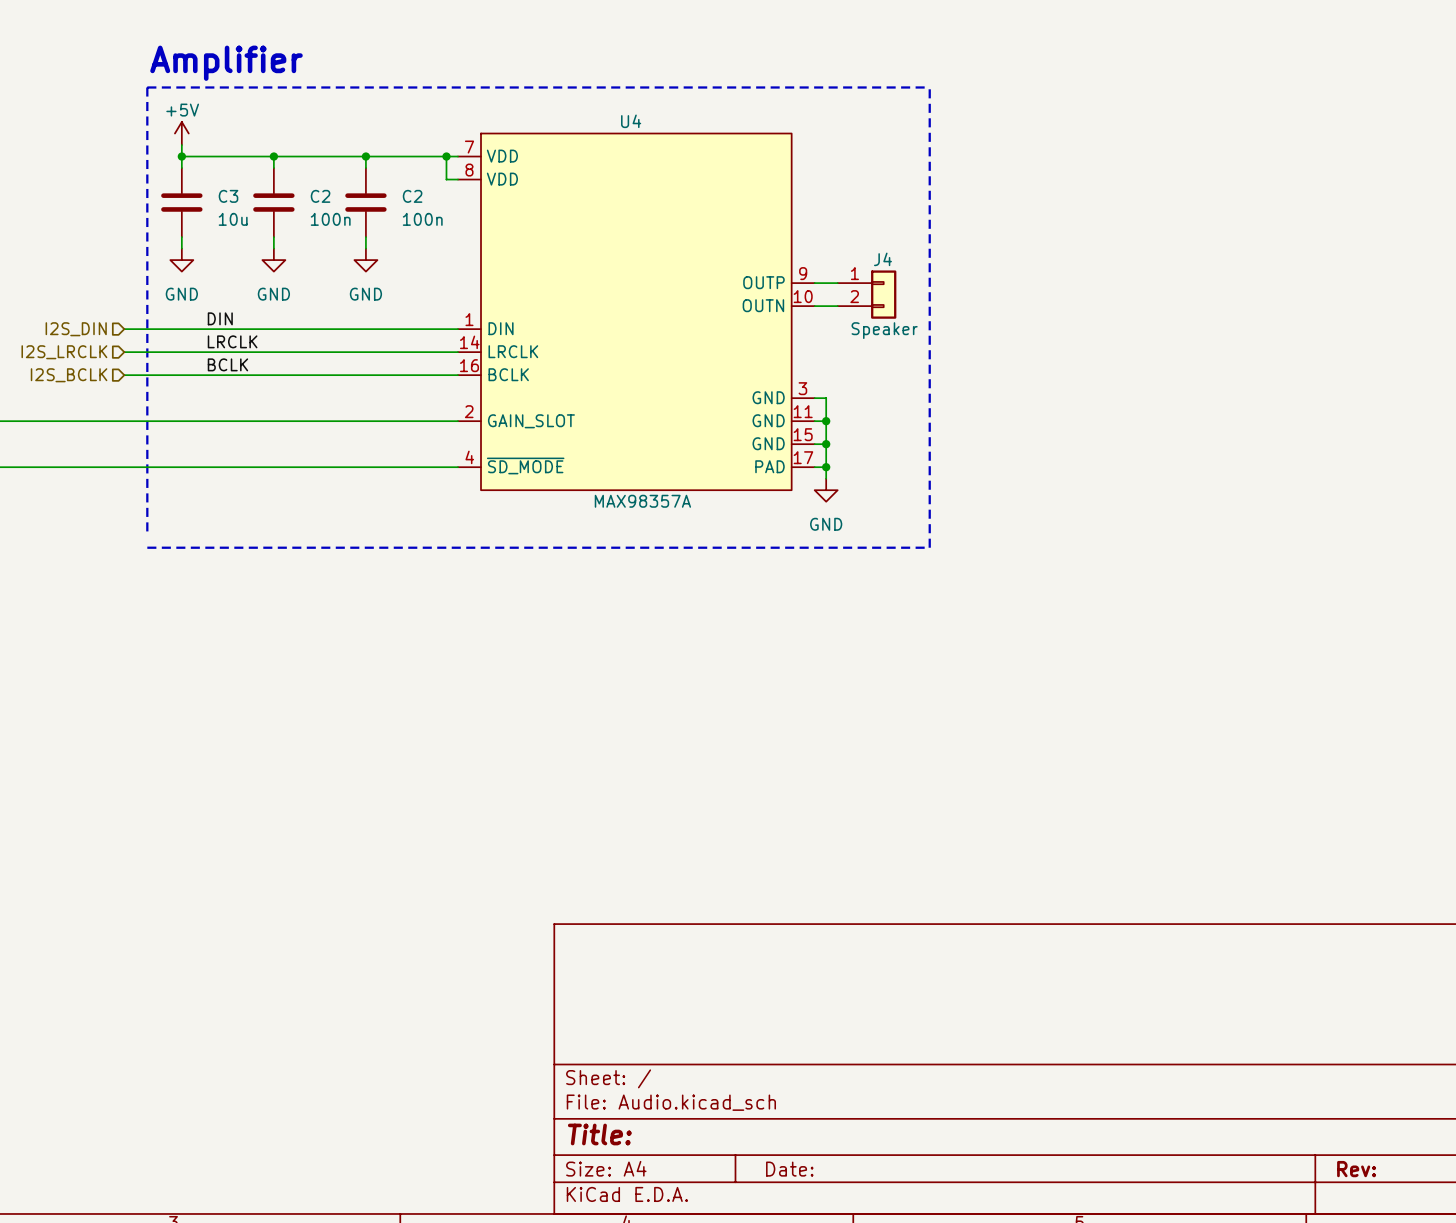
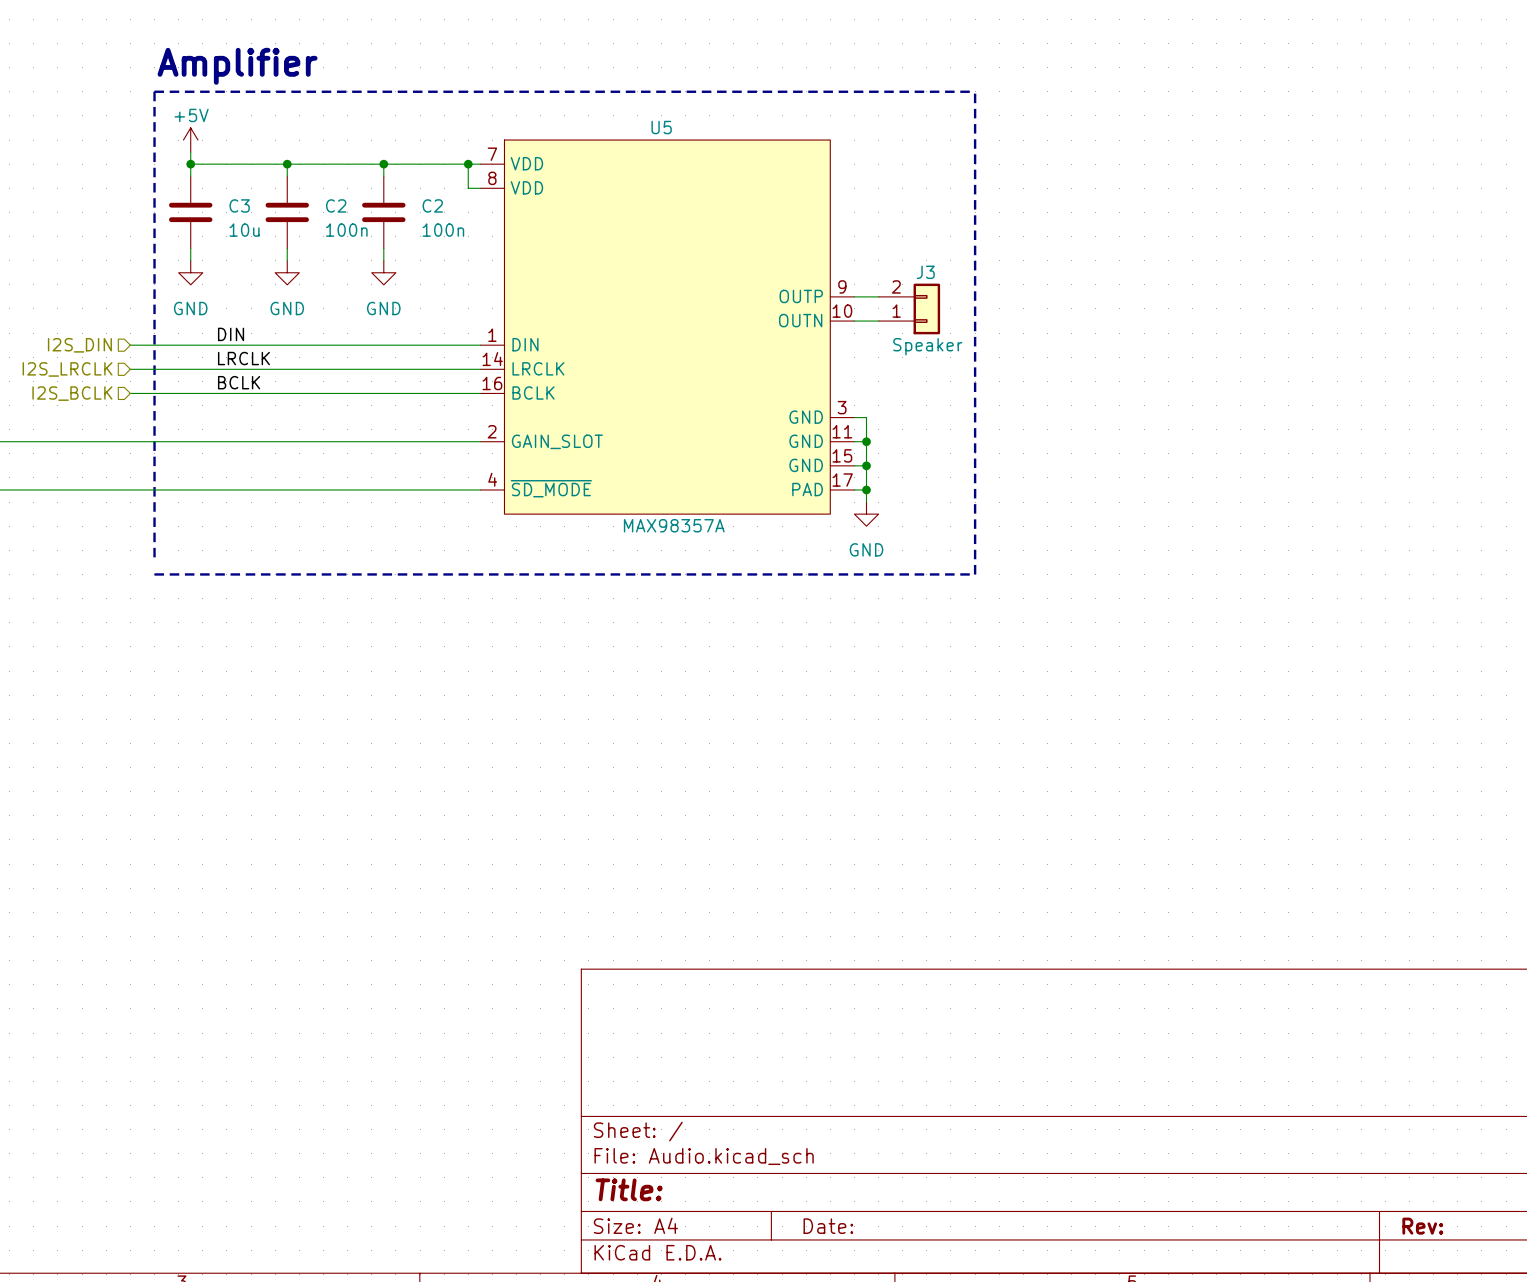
U4 name: U4 (631, 121) -> U5 (661, 127)
J4 name: J4 (882, 259) -> J3 (925, 272)
J4 flip: as is (883, 294) -> up-down (926, 308)

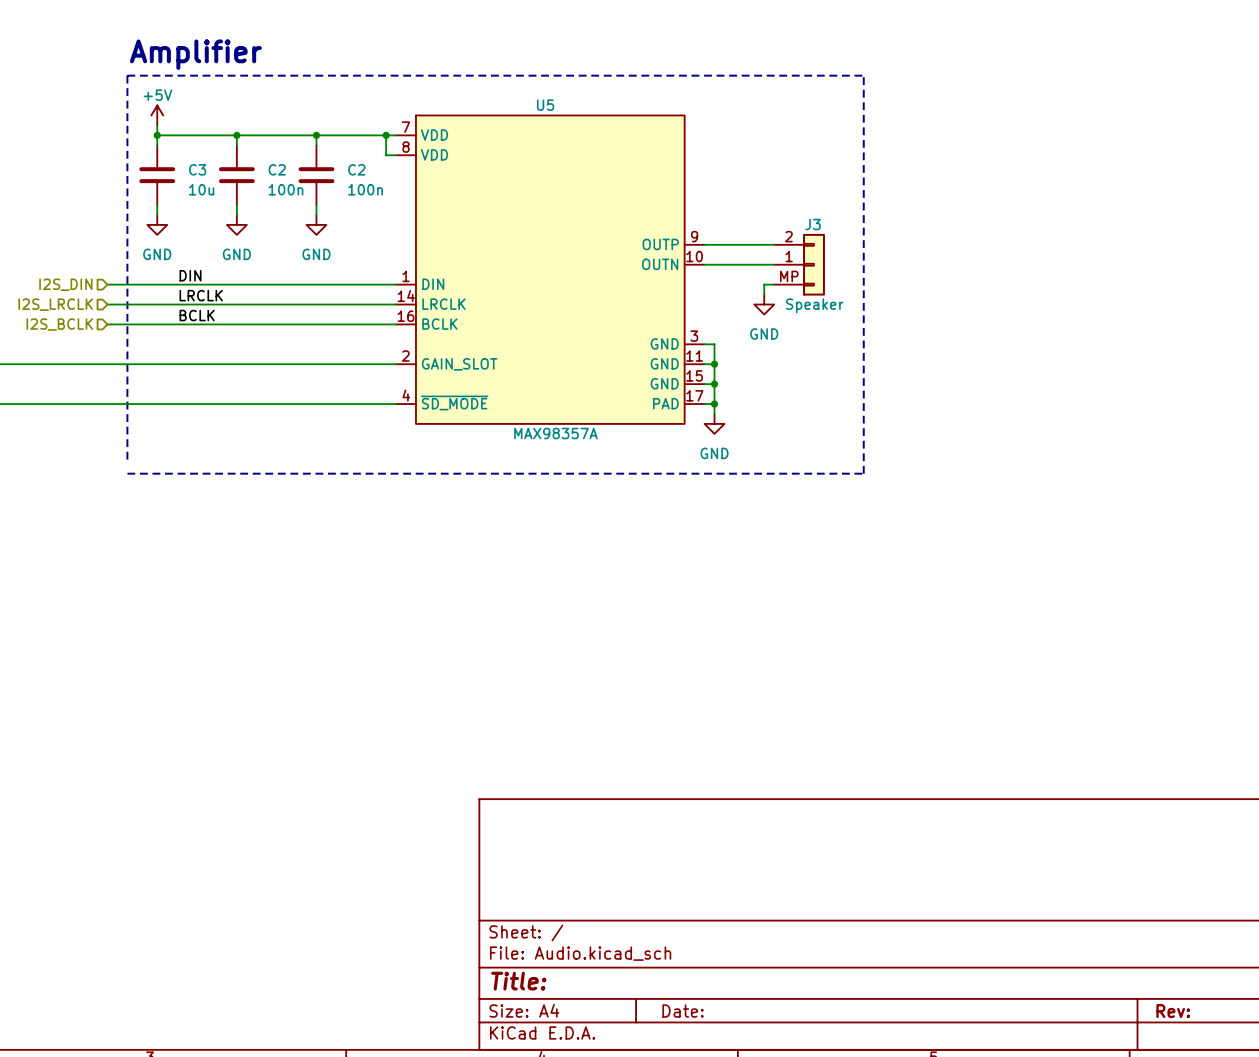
line: (975, 91) (975, 574) -> (804, 75) (863, 75) (863, 473) (804, 473)
J3 symbol: [878, 283, 941, 335] -> [774, 233, 825, 296]
wire: none -> (774, 284) (764, 284) (764, 294)
power symbol: none -> GND (764, 304)

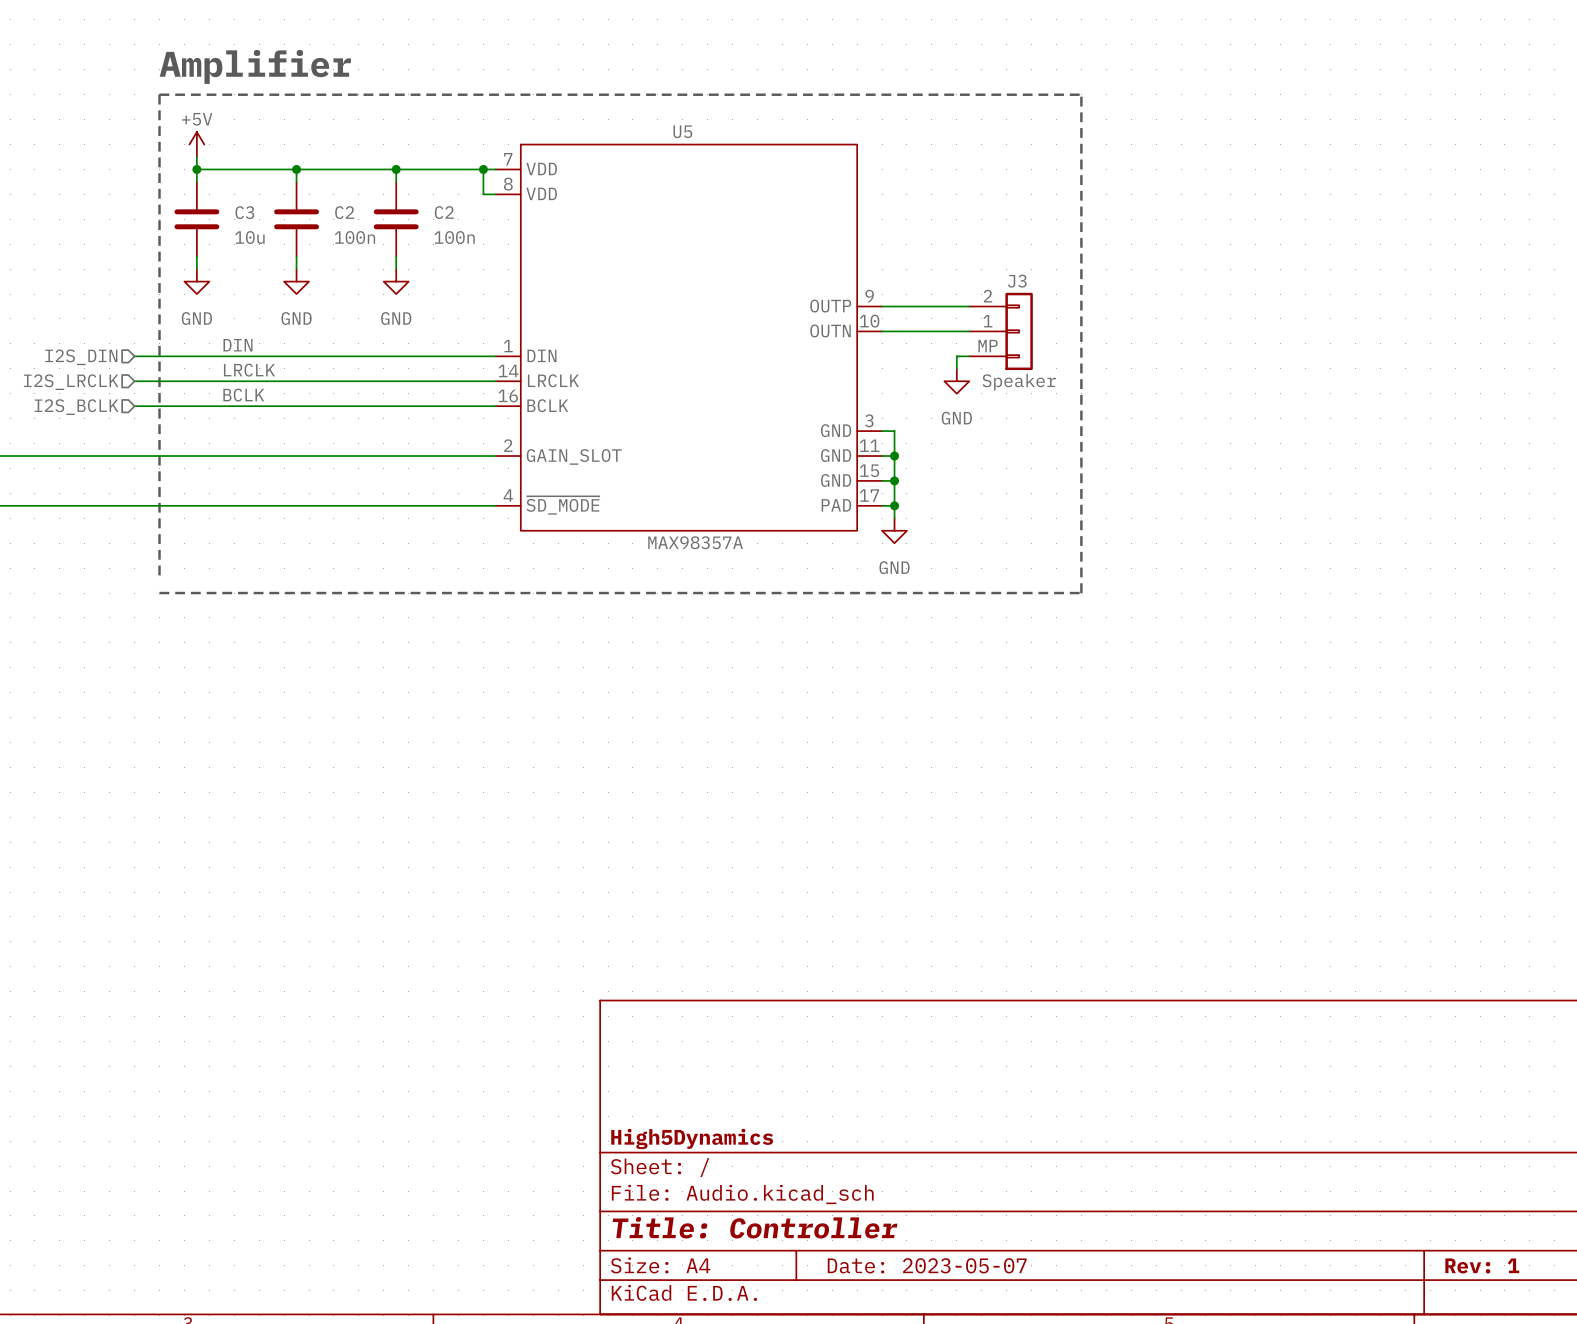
title block: none -> High5Dynamics (692, 1138)
title block: Title: (518, 981) -> Title: Controller (755, 1227)
title block: Date: (683, 1011) -> Date: 2023-05-07 (927, 1265)
title block: Rev: (1173, 1011) -> Rev: 1 (1482, 1265)

